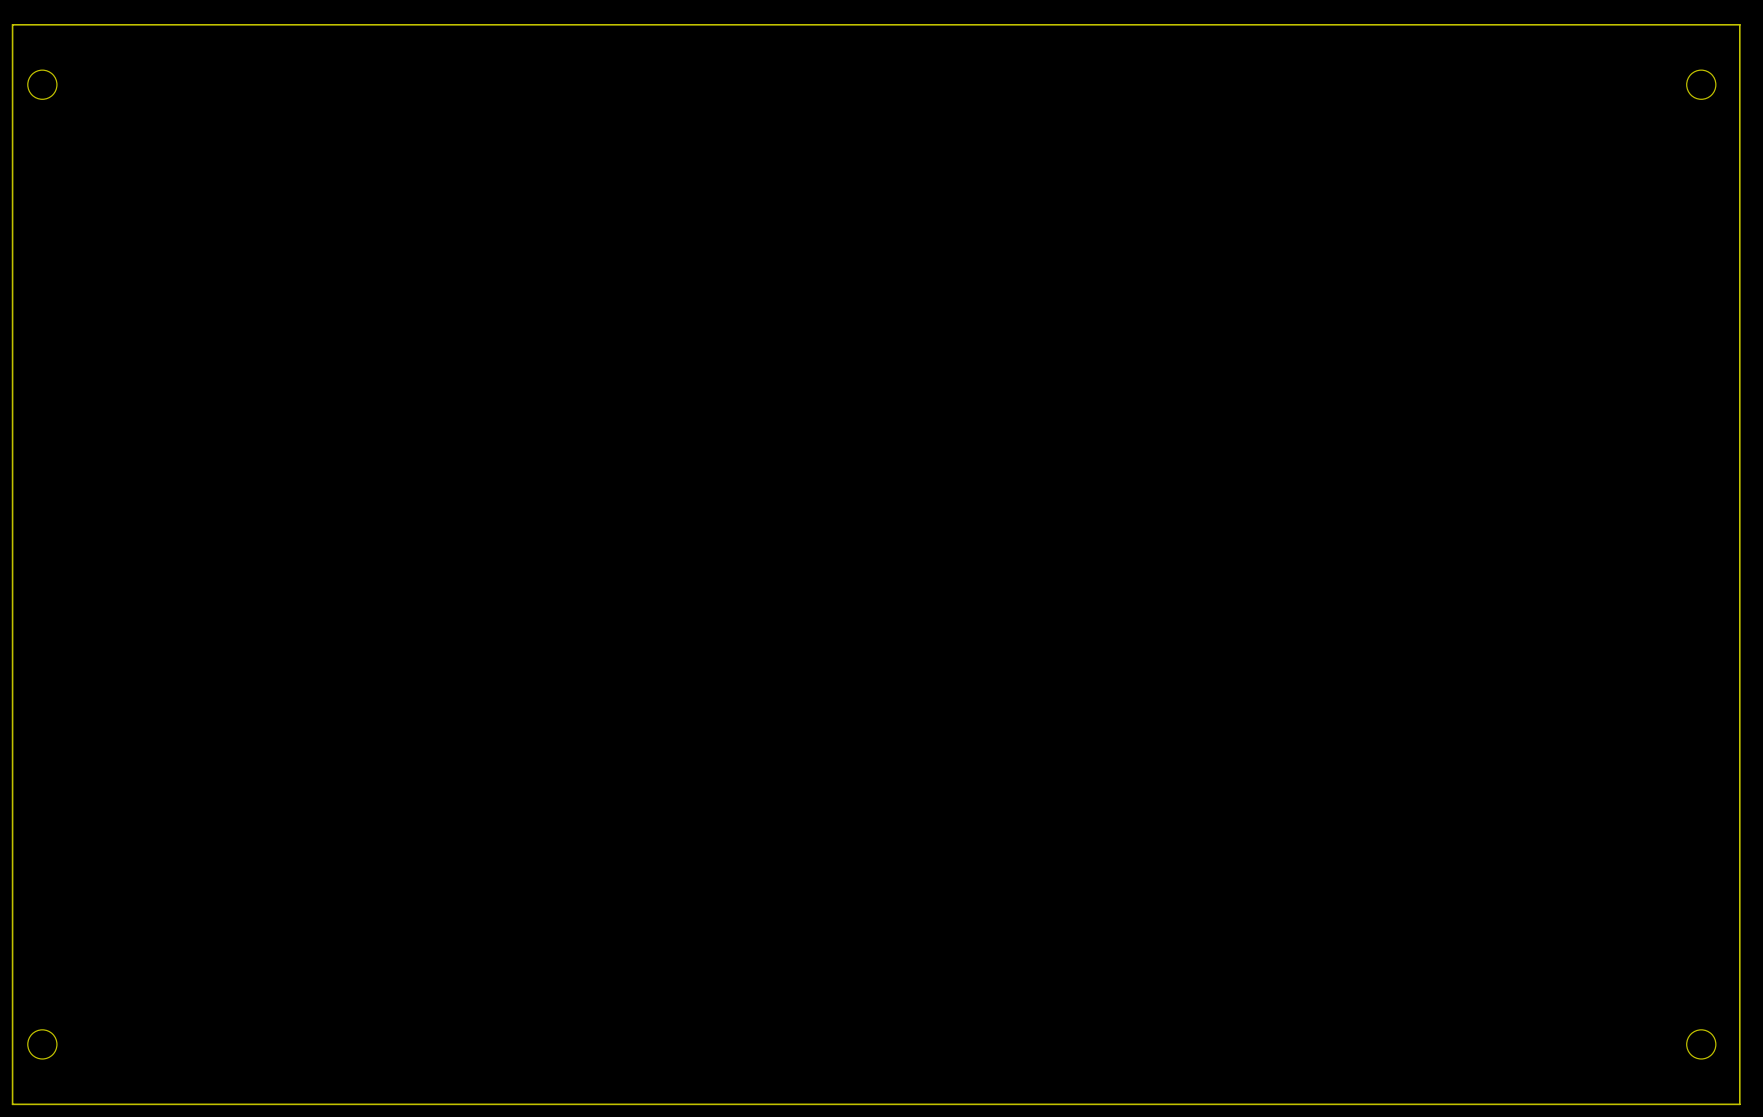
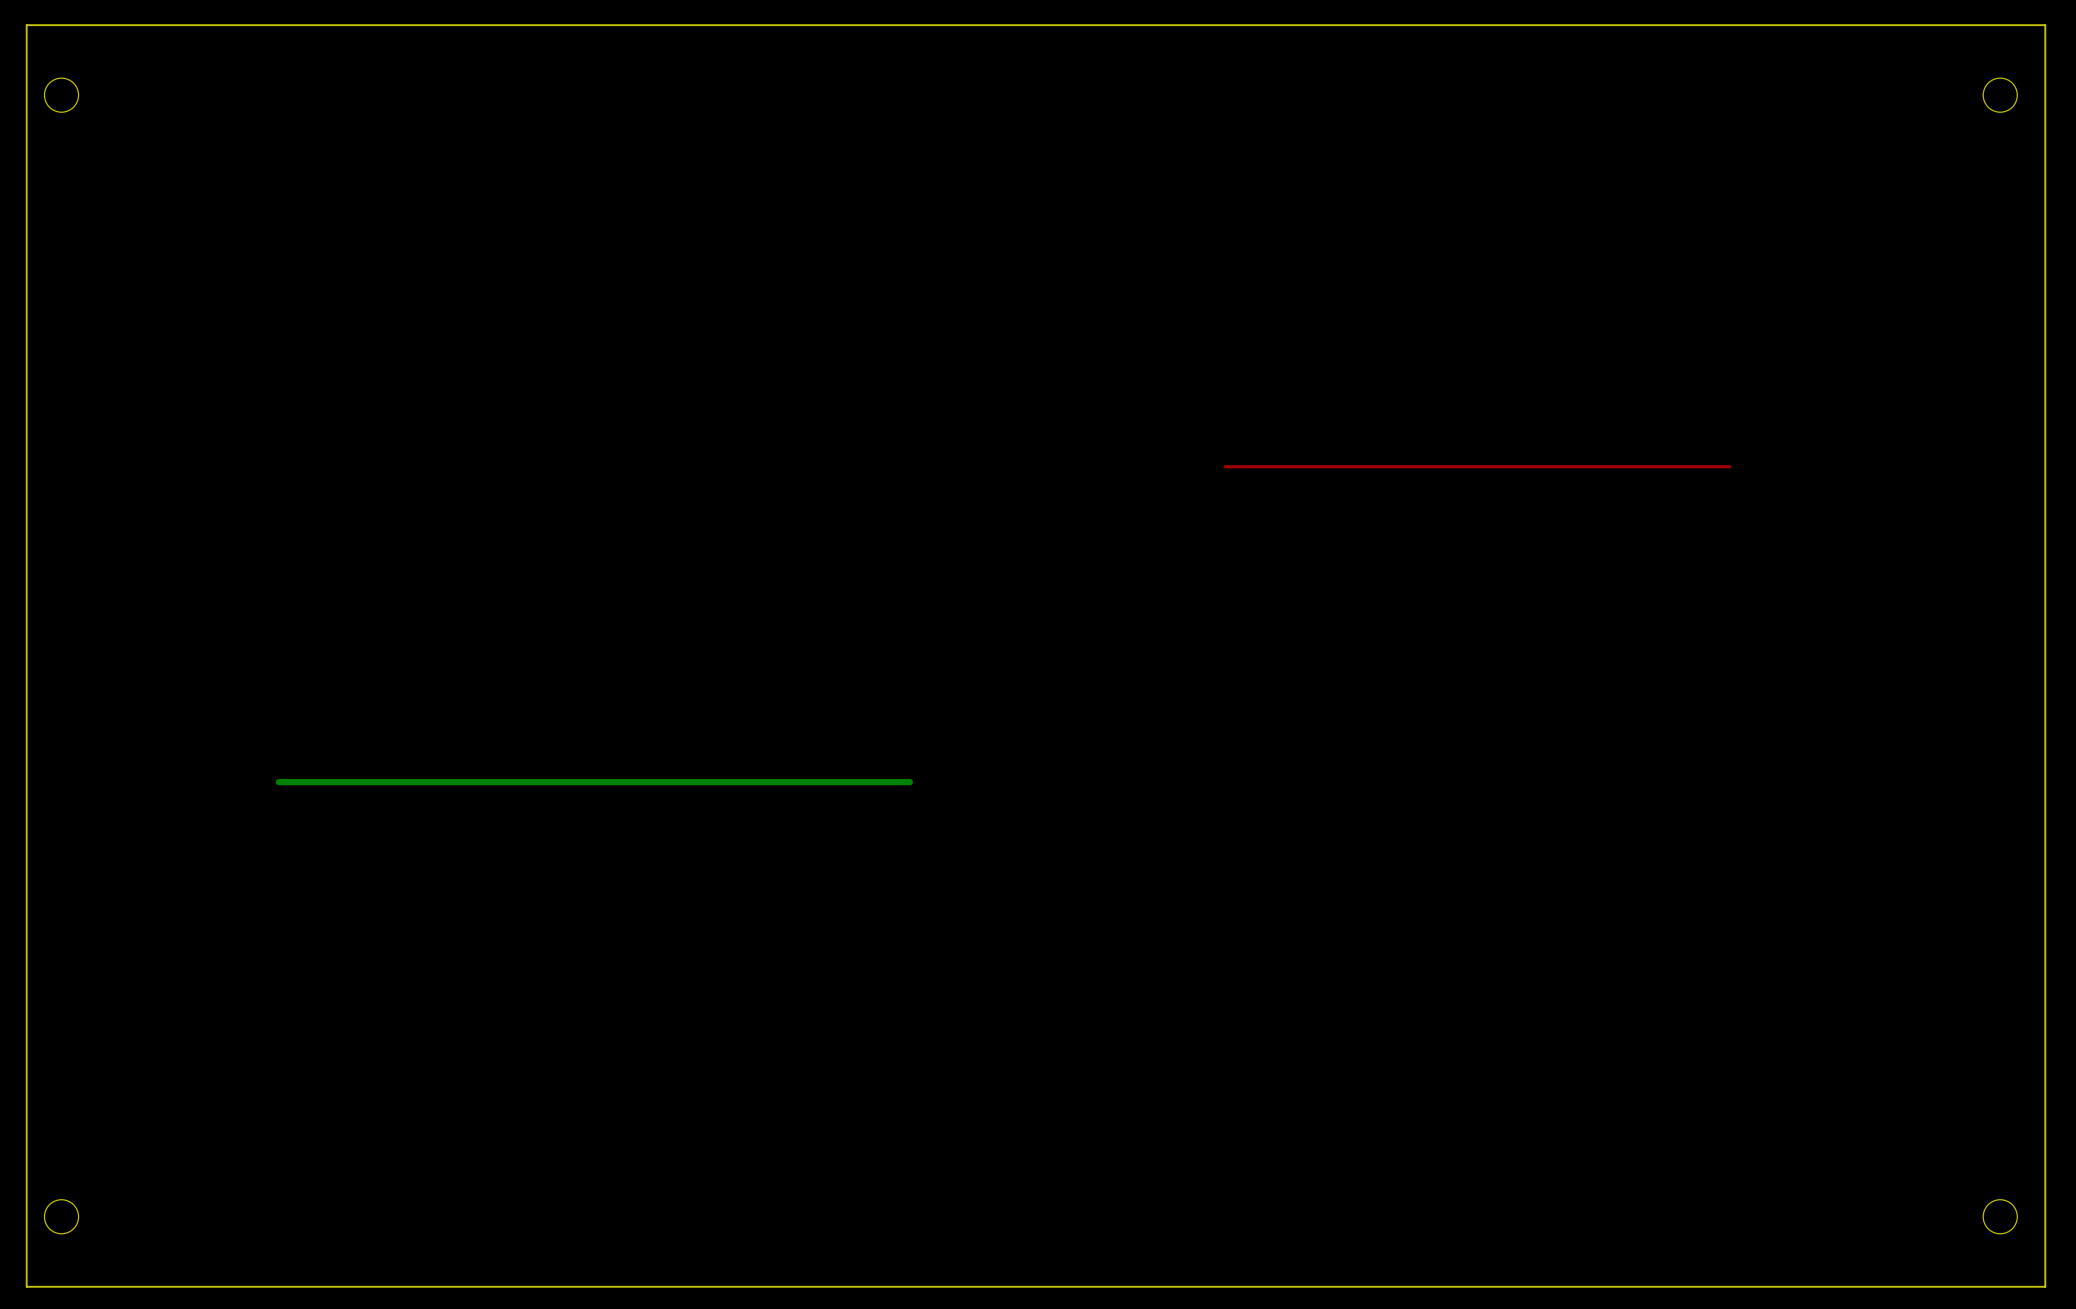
top track: none -> (1729, 466) (1225, 466)
bottom track: none -> (909, 782) (279, 782)

